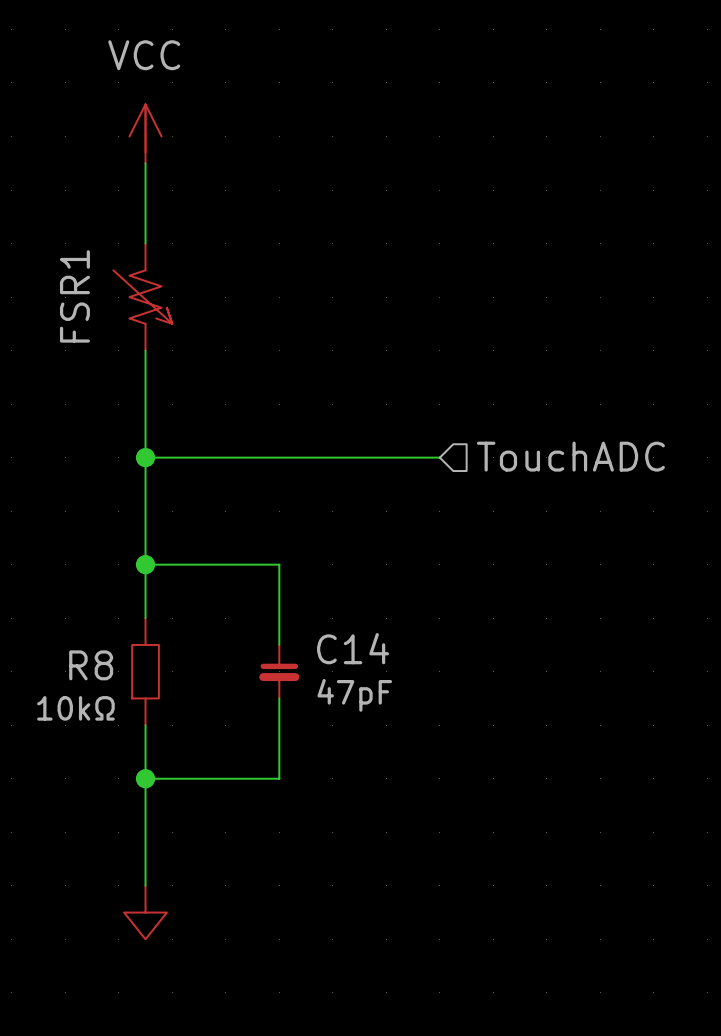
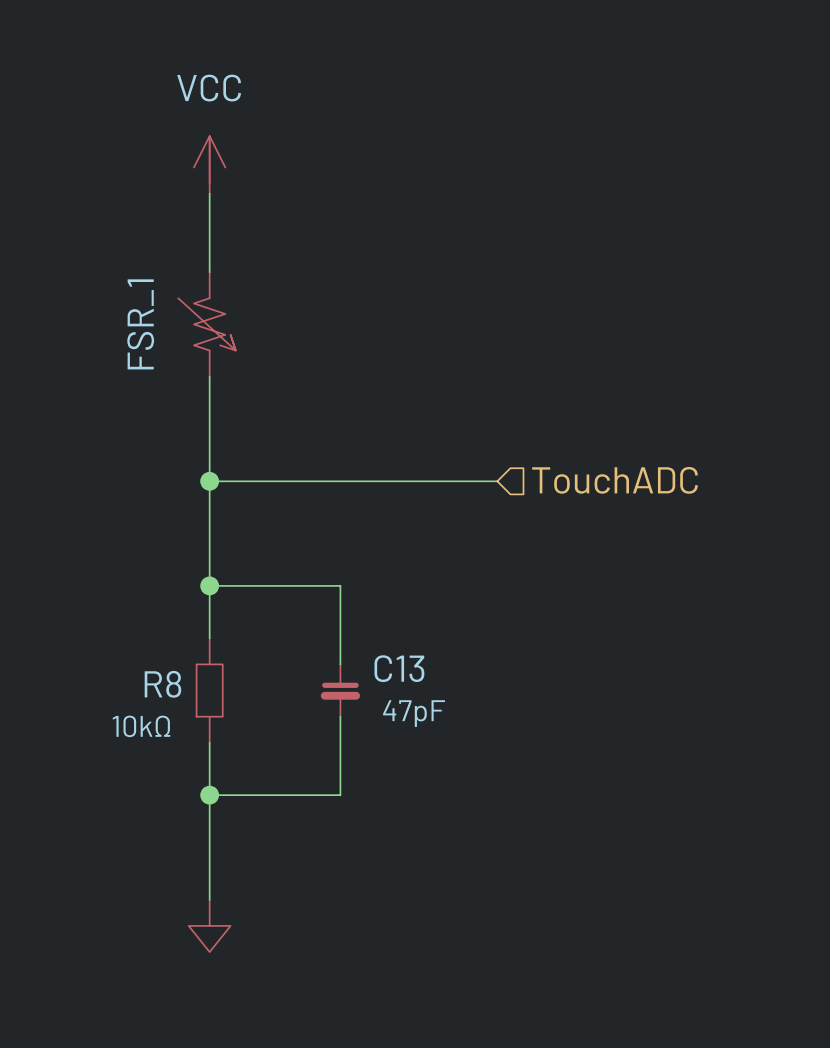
FSR1 name: FSR1 (74, 296) -> FSR_1 (140, 324)
C14 name: C14 (353, 648) -> C13 (399, 668)

